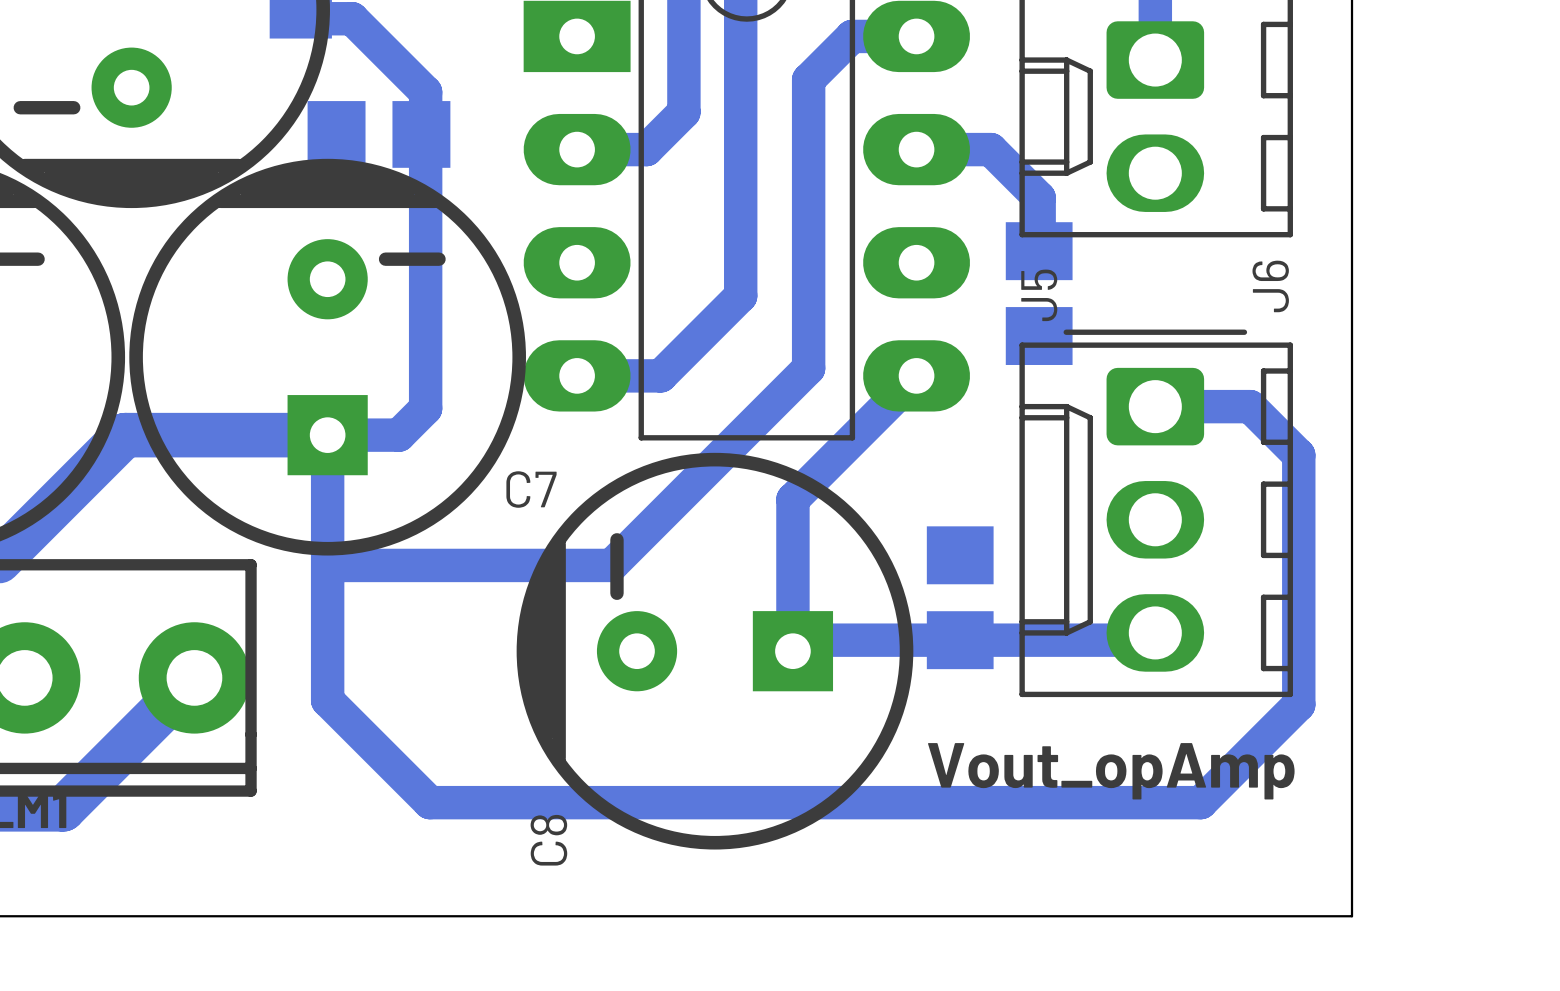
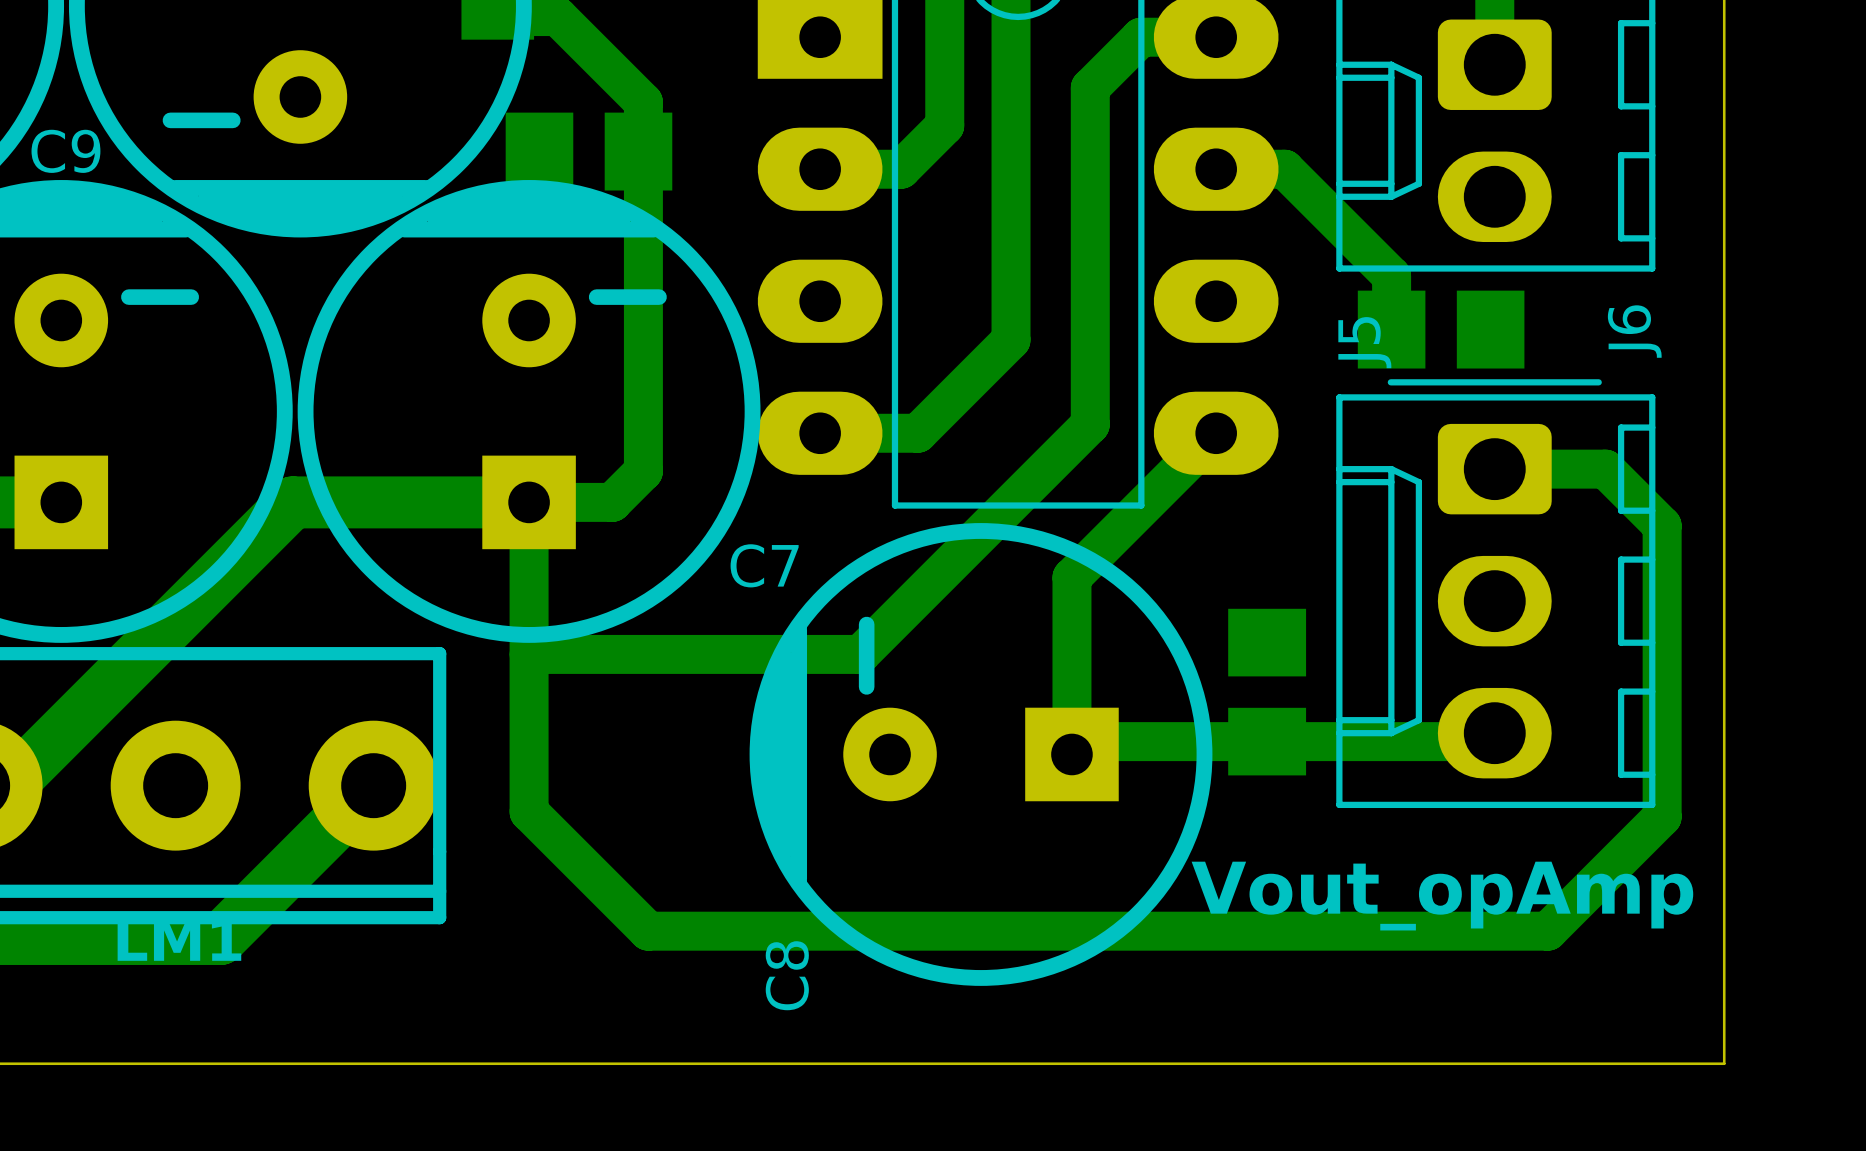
bottom track: (975, 149) (990, 149) (1039, 197) (1039, 251) -> (1284, 169) (1391, 276) (1391, 329)
part rotation: 0° (1039, 293) -> 90° clockwise (1441, 329)

